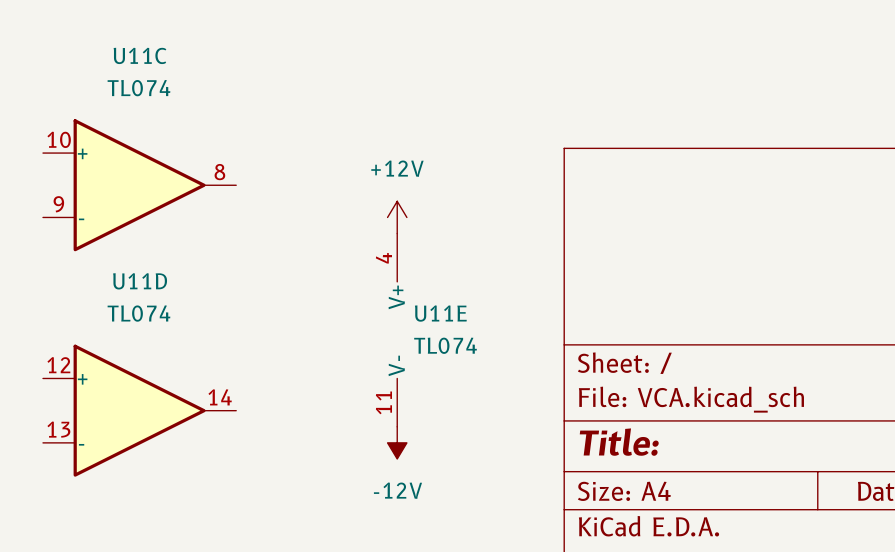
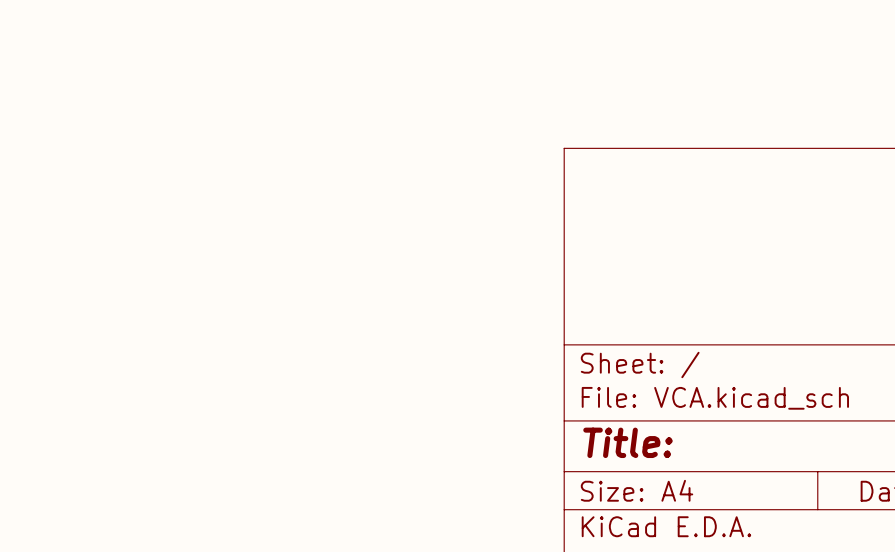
U11C: TL074 (139, 185) -> none
power symbol: +12V (397, 217) -> none
U11E: TL074 (397, 330) -> none
U11D: TL074 (139, 410) -> none
power symbol: -12V (397, 442) -> none

